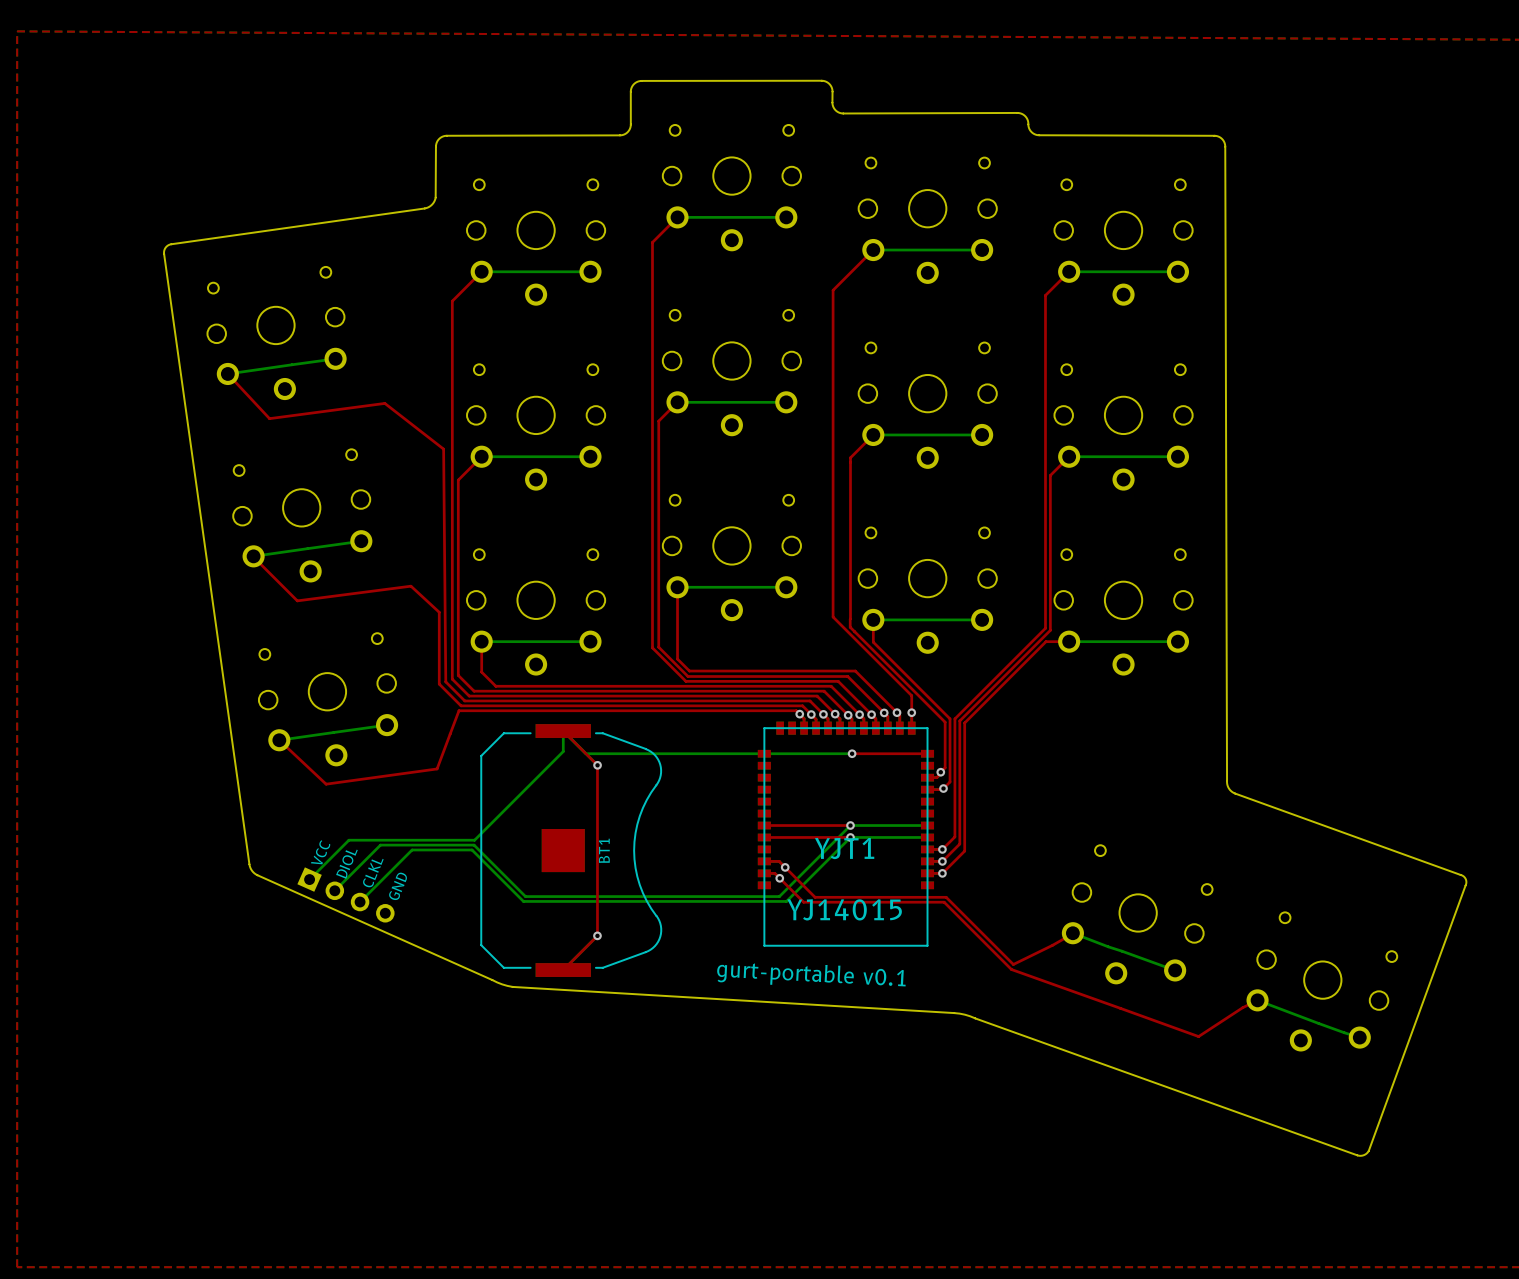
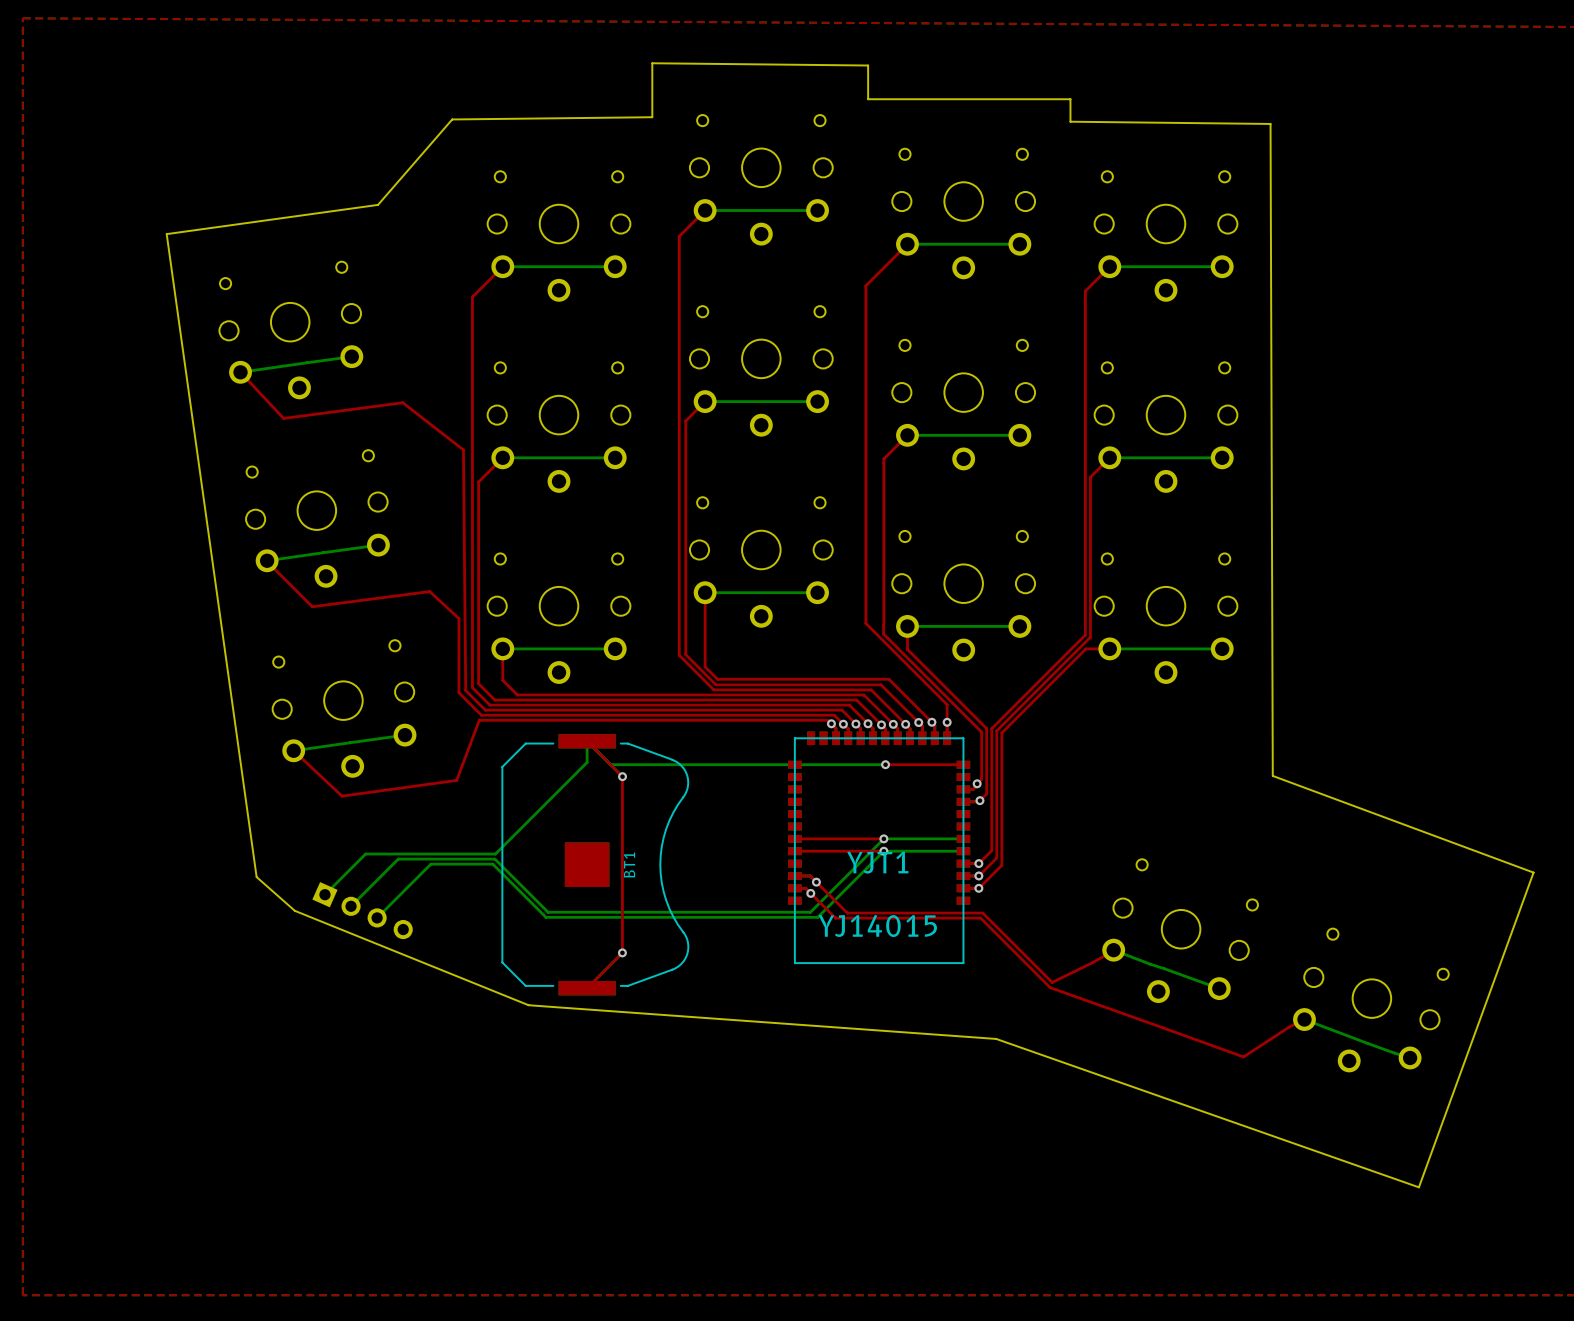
board edge: (821, 80) (639, 81) (631, 88) (630, 126) (627, 132) (622, 135) (446, 135) (441, 137) (436, 145) (435, 197) (433, 203) (426, 208) (171, 244) (165, 247) (164, 254) (251, 869) (257, 875) (507, 985) (959, 1013) (1357, 1155) (1364, 1154) (1368, 1151) (1466, 880) (1461, 875) (1235, 793) (1227, 785) (1224, 141) (1220, 137) (1214, 135) (1038, 135) (1030, 131) (1026, 118) (1018, 113) (842, 113) (836, 111) (833, 106) (830, 85) (821, 80) -> (652, 63) (652, 117) (452, 119) (378, 204) (166, 234) (256, 877) (294, 910) (528, 1005) (996, 1038) (1418, 1187) (1533, 872) (1272, 775) (1270, 123) (1070, 121) (1070, 99) (868, 99) (868, 65) (652, 63)
text: VCC (320, 852) -> none
text: DIOL (346, 864) -> none
text: CLKL (373, 873) -> none
text: GND (397, 886) -> none
text: gurt-portable v0.1 (811, 974) -> none

